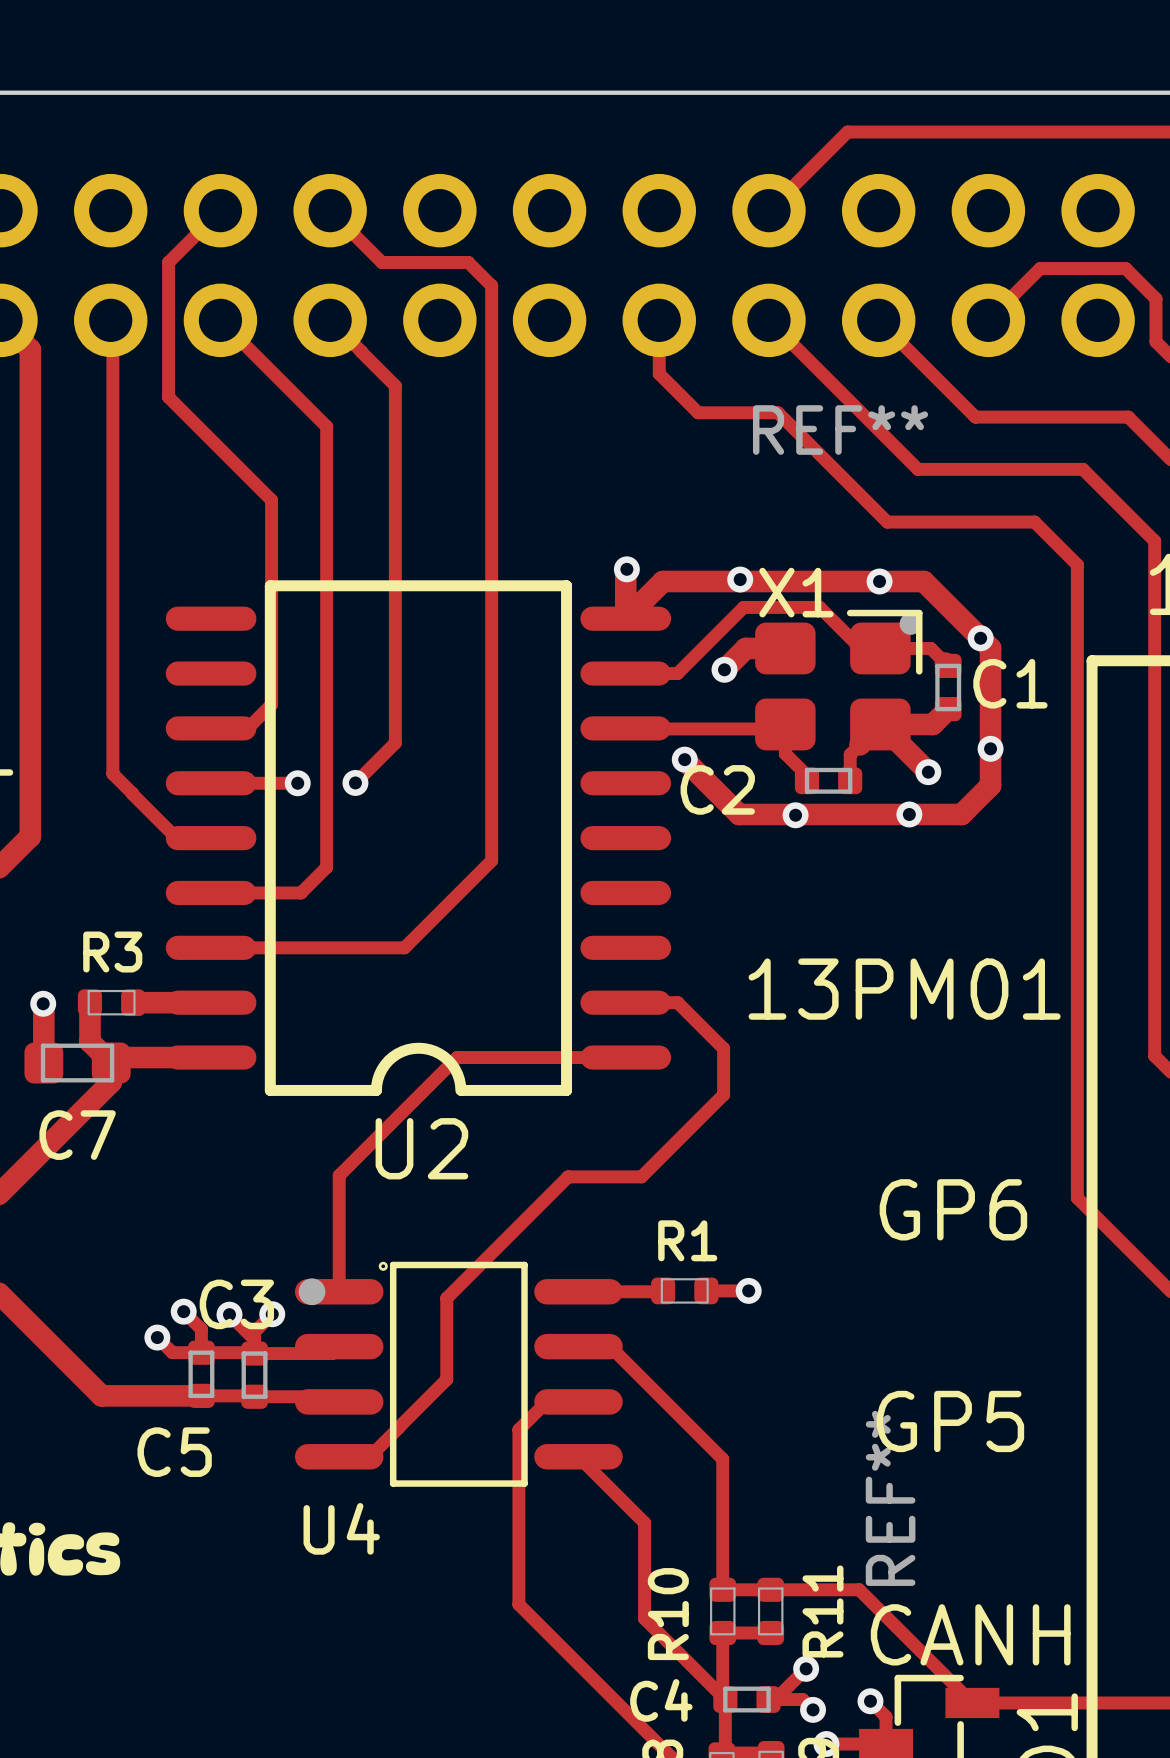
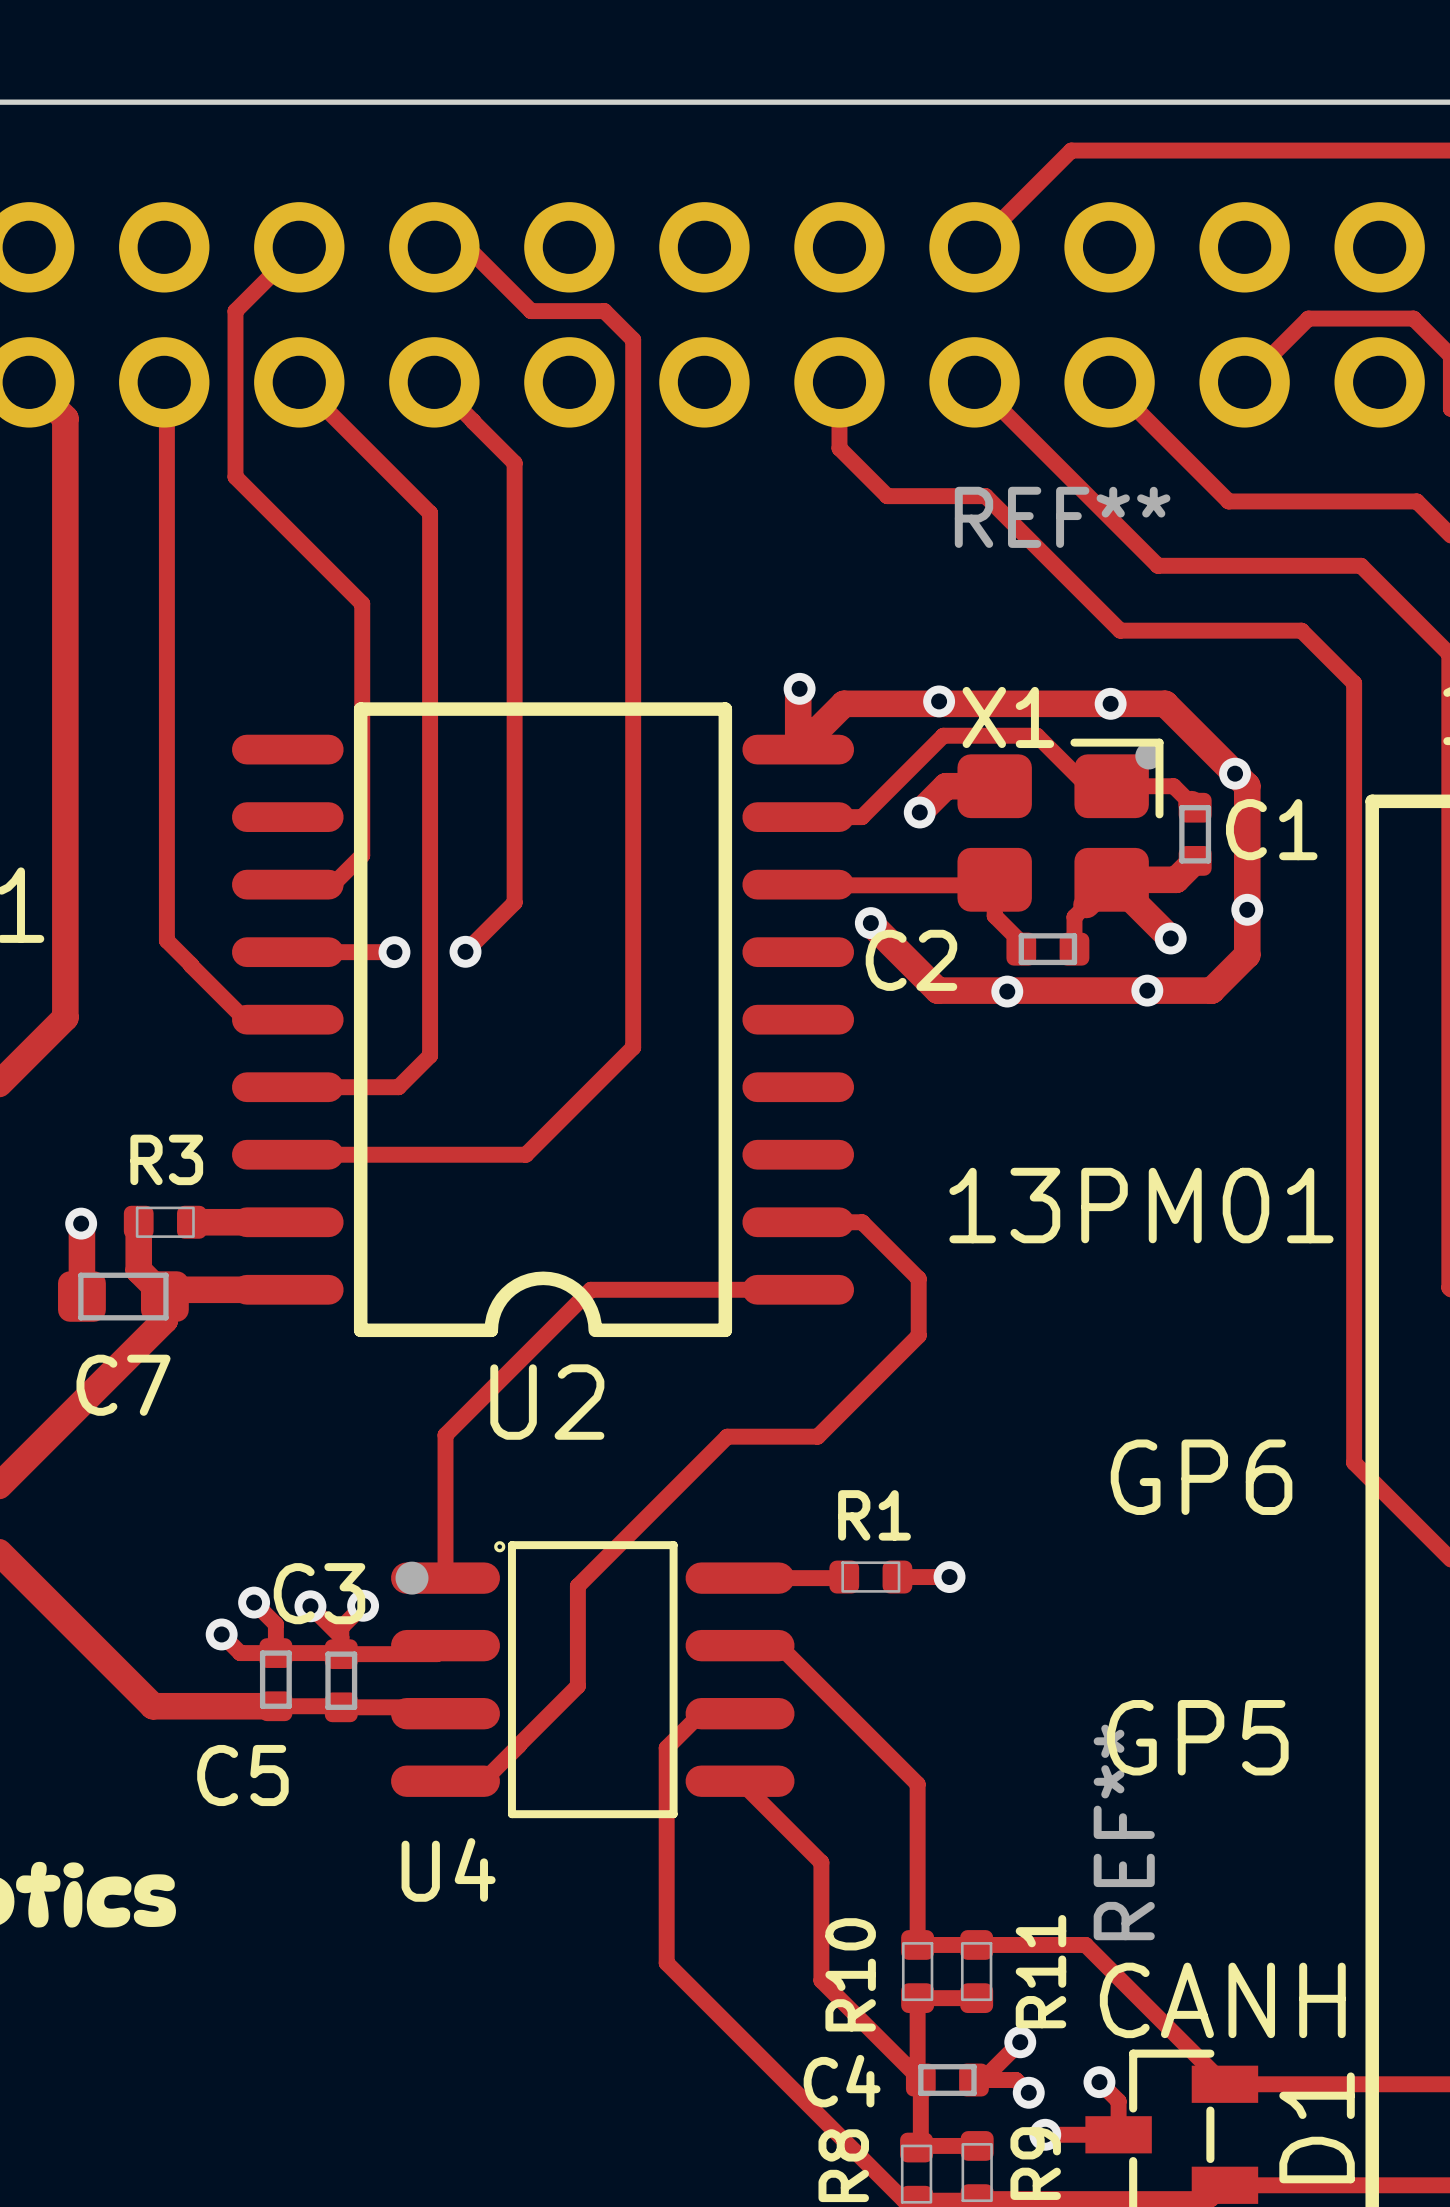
track: (330, 210) (381, 262) (408, 262) -> (434, 247) (467, 247) (531, 311)

